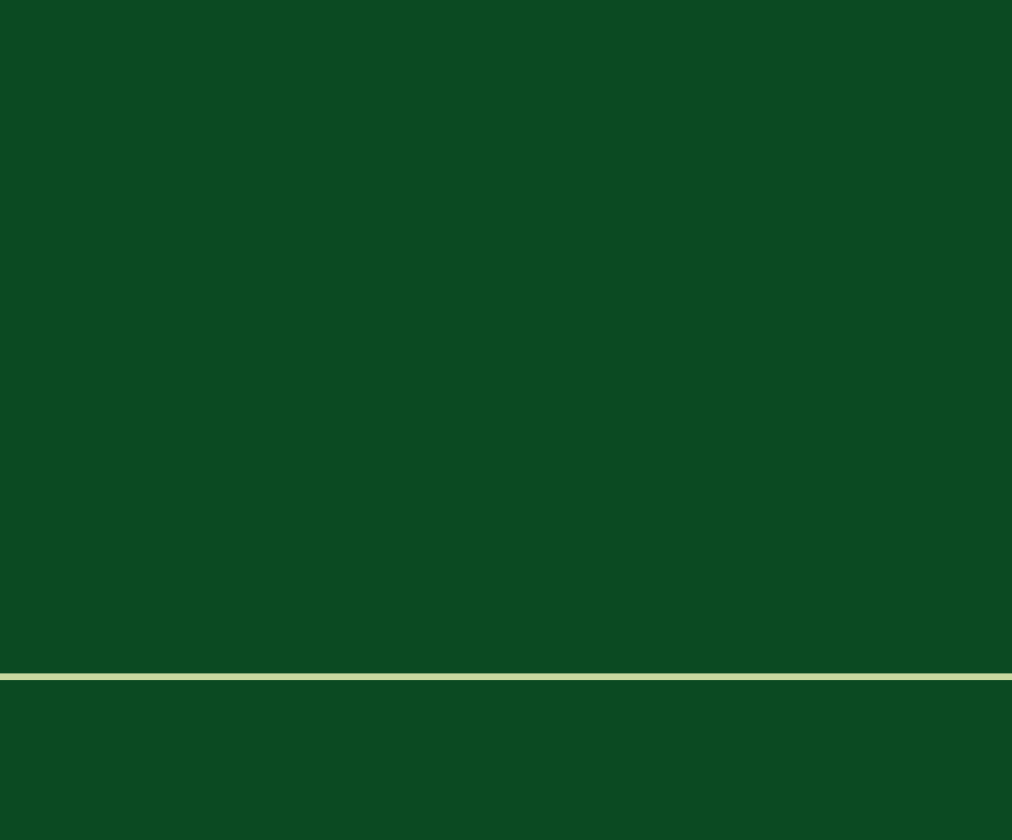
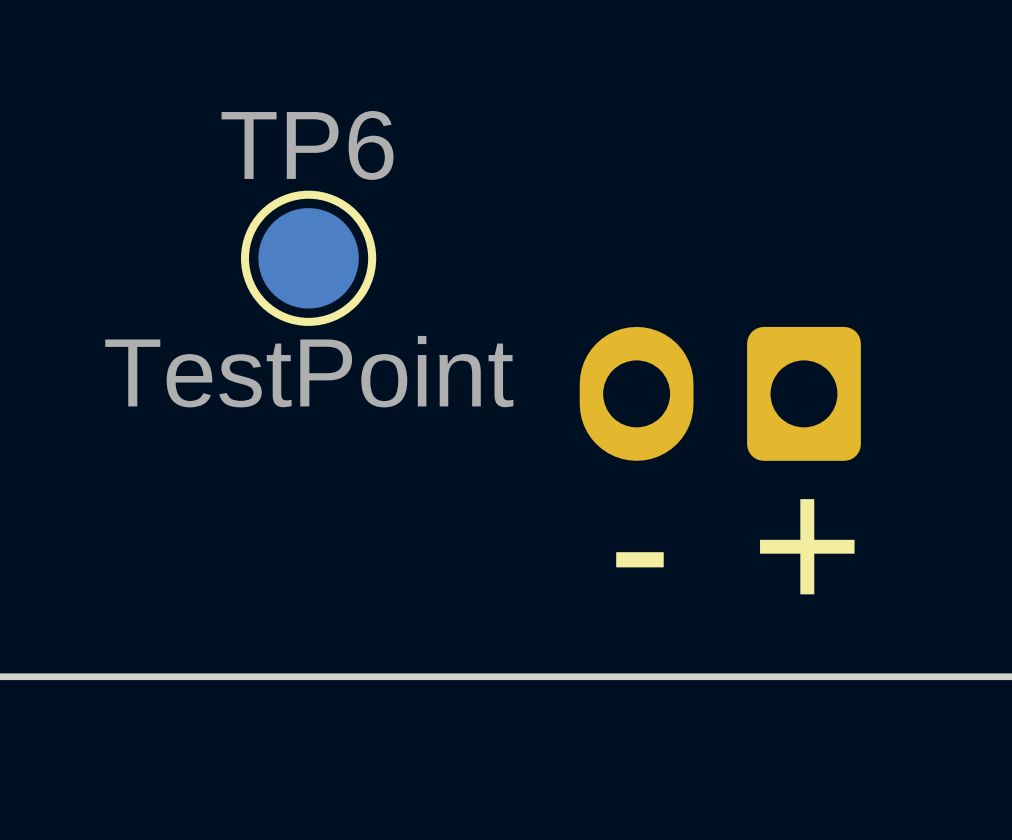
TP6: none -> TestPoint (308, 258)
part: none -> (720, 393)
text: none -> - (639, 559)
text: none -> + (807, 546)

